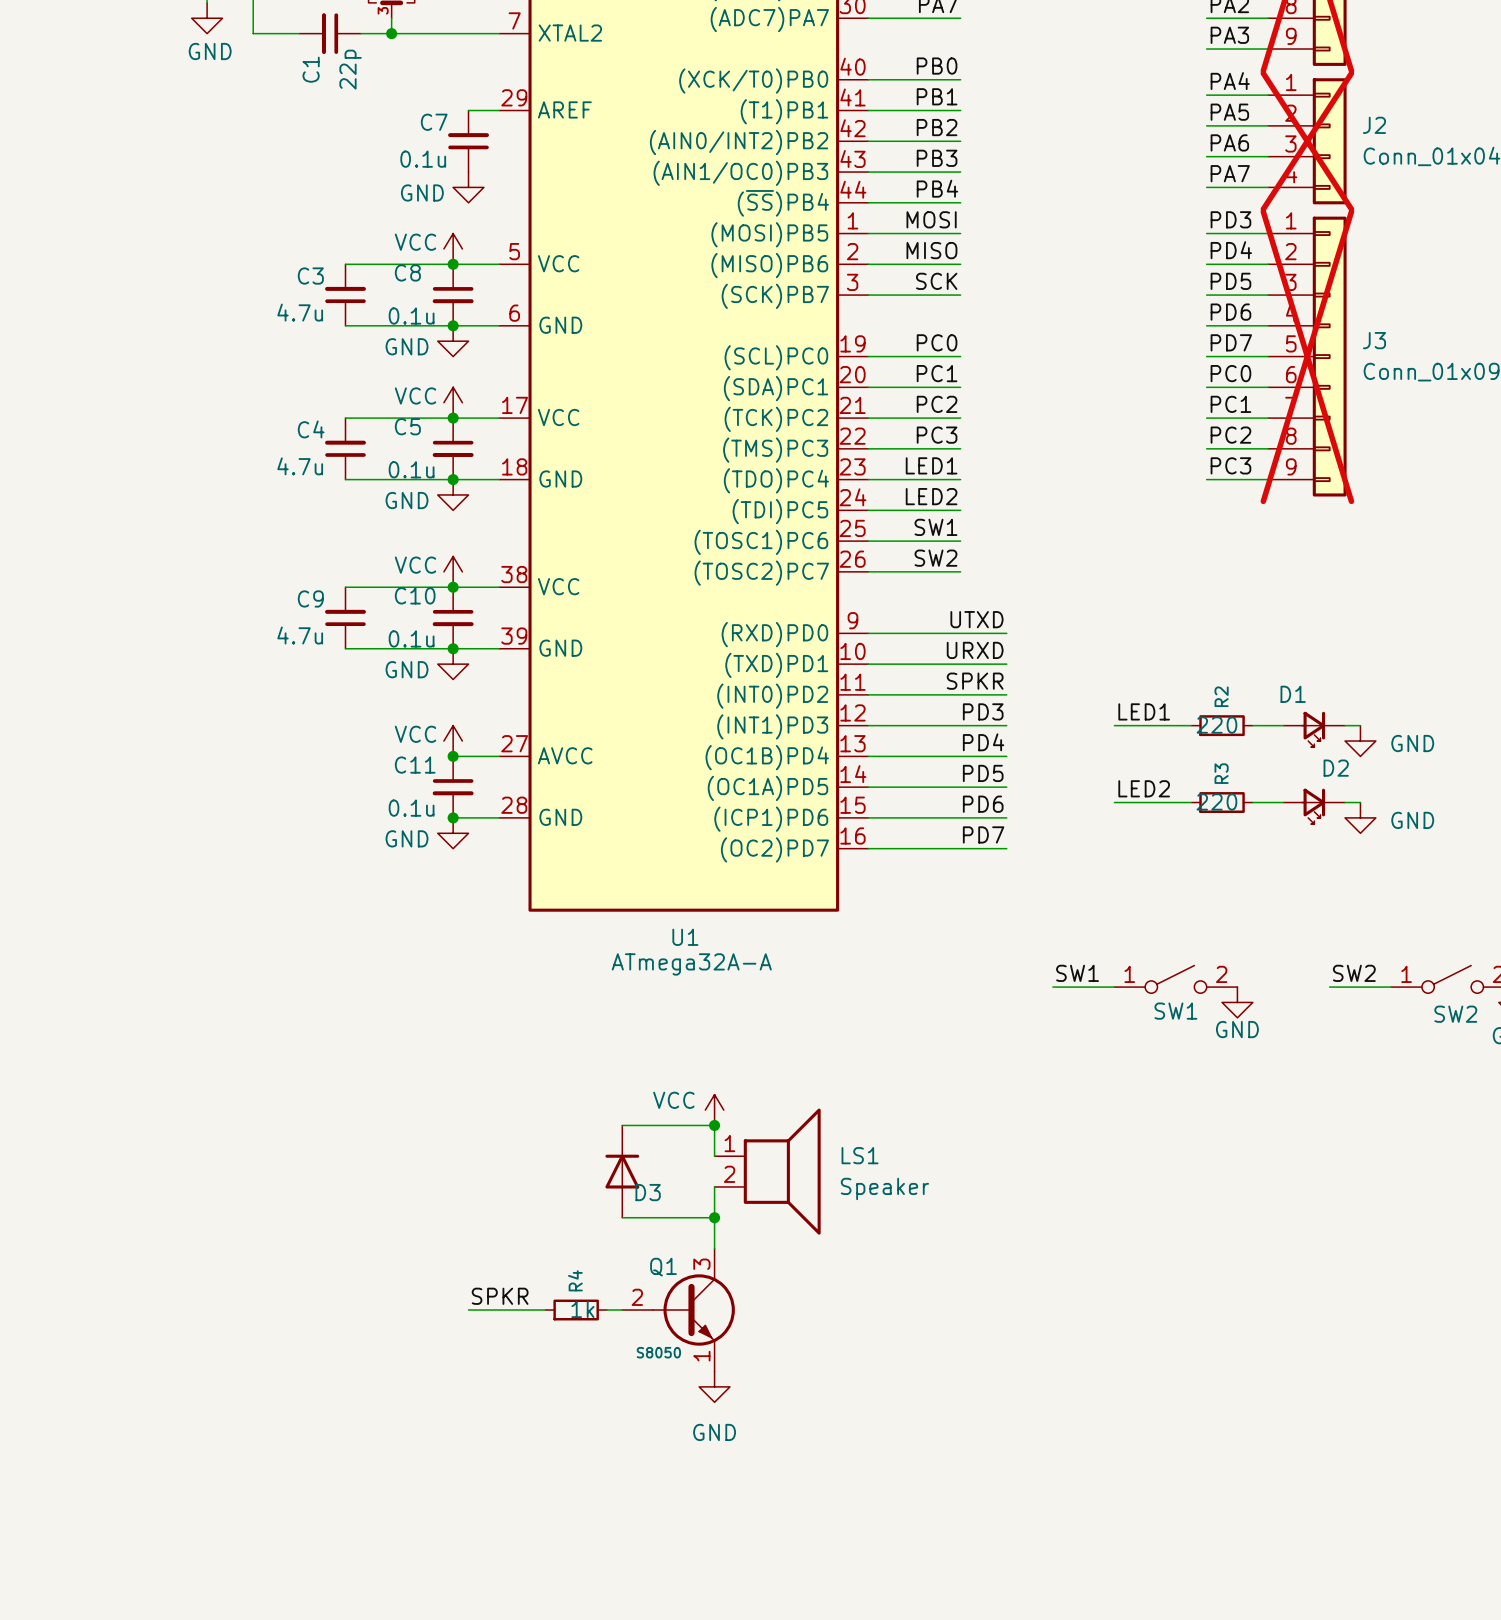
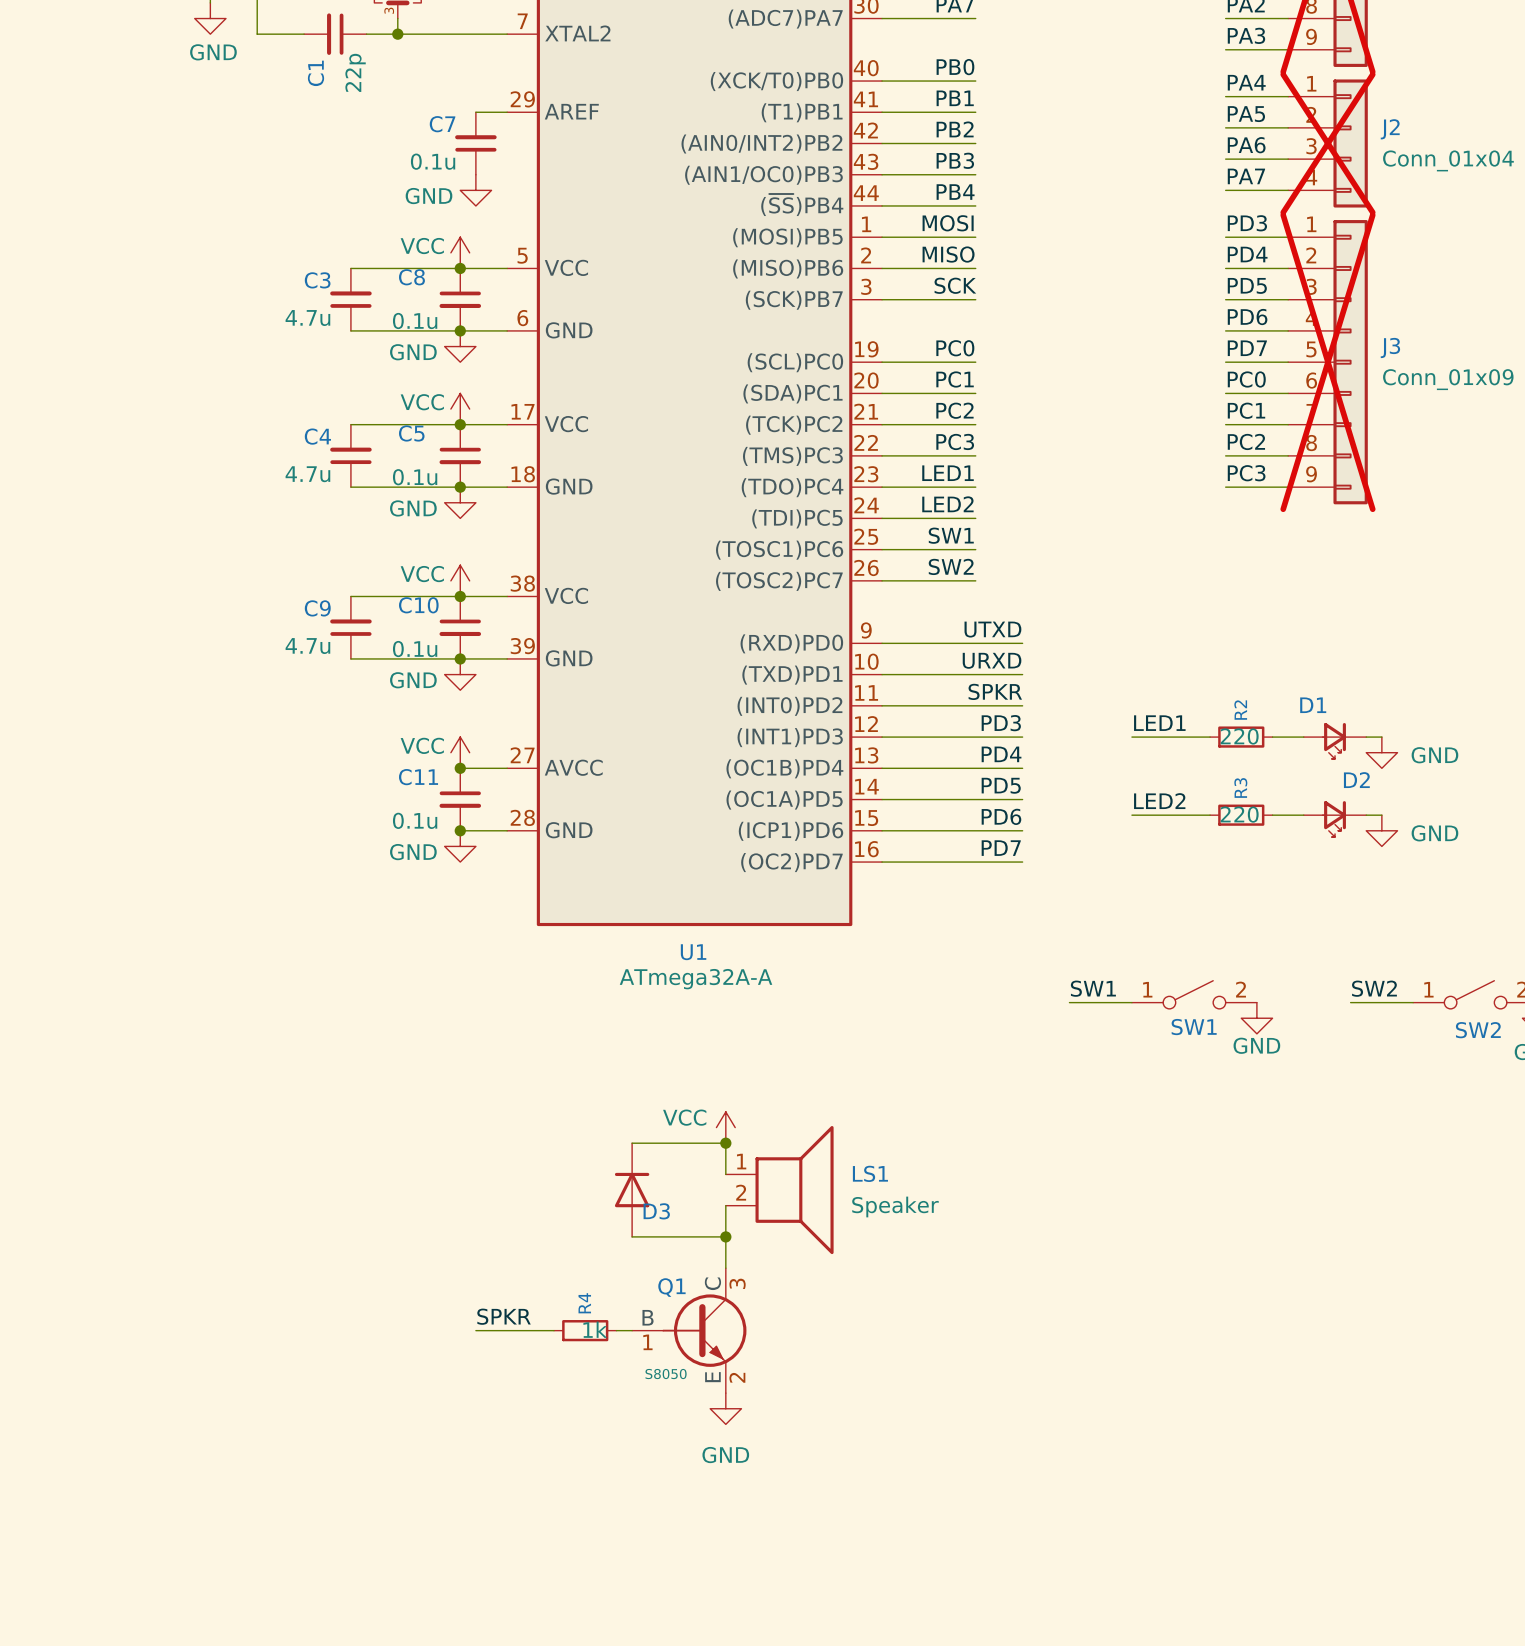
Q1 symbol: [622, 1248, 735, 1372] -> [632, 1268, 747, 1394]

